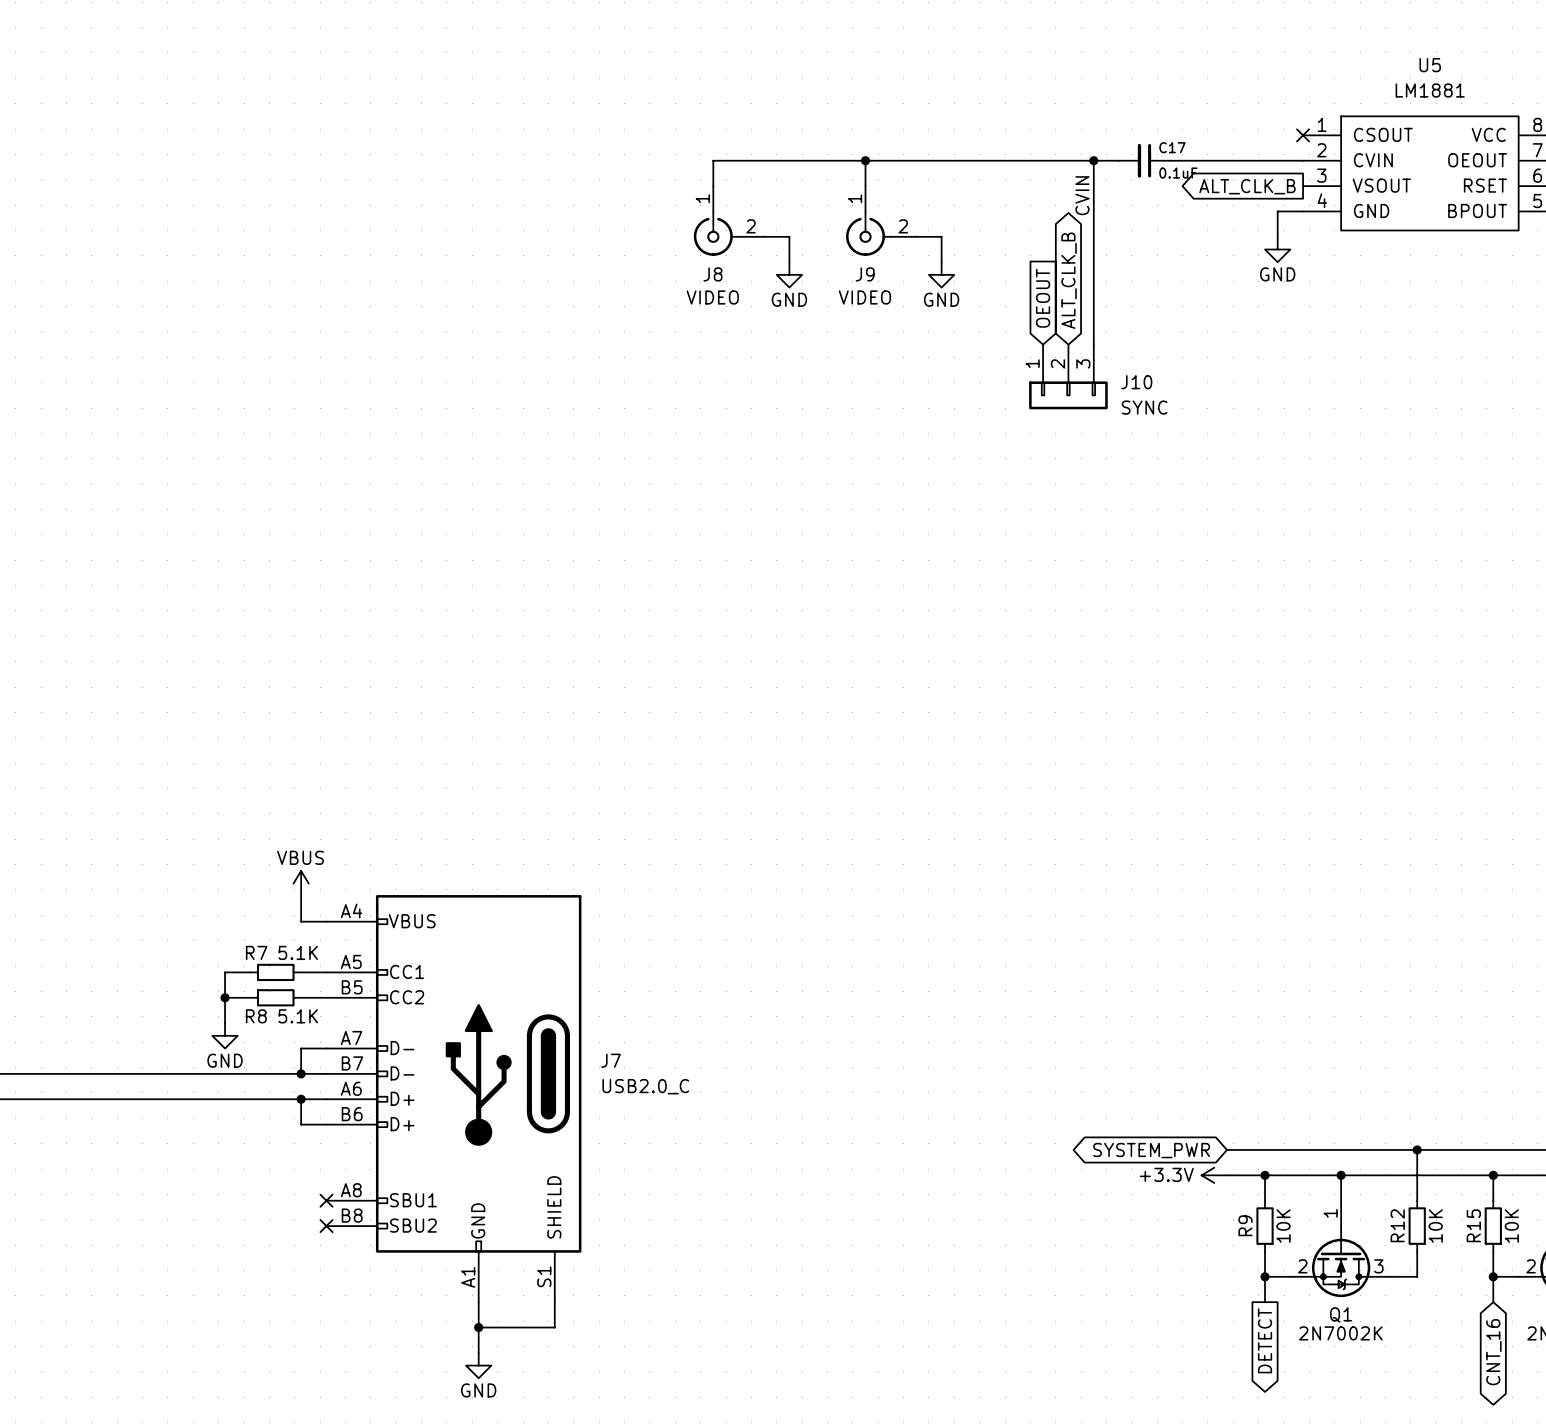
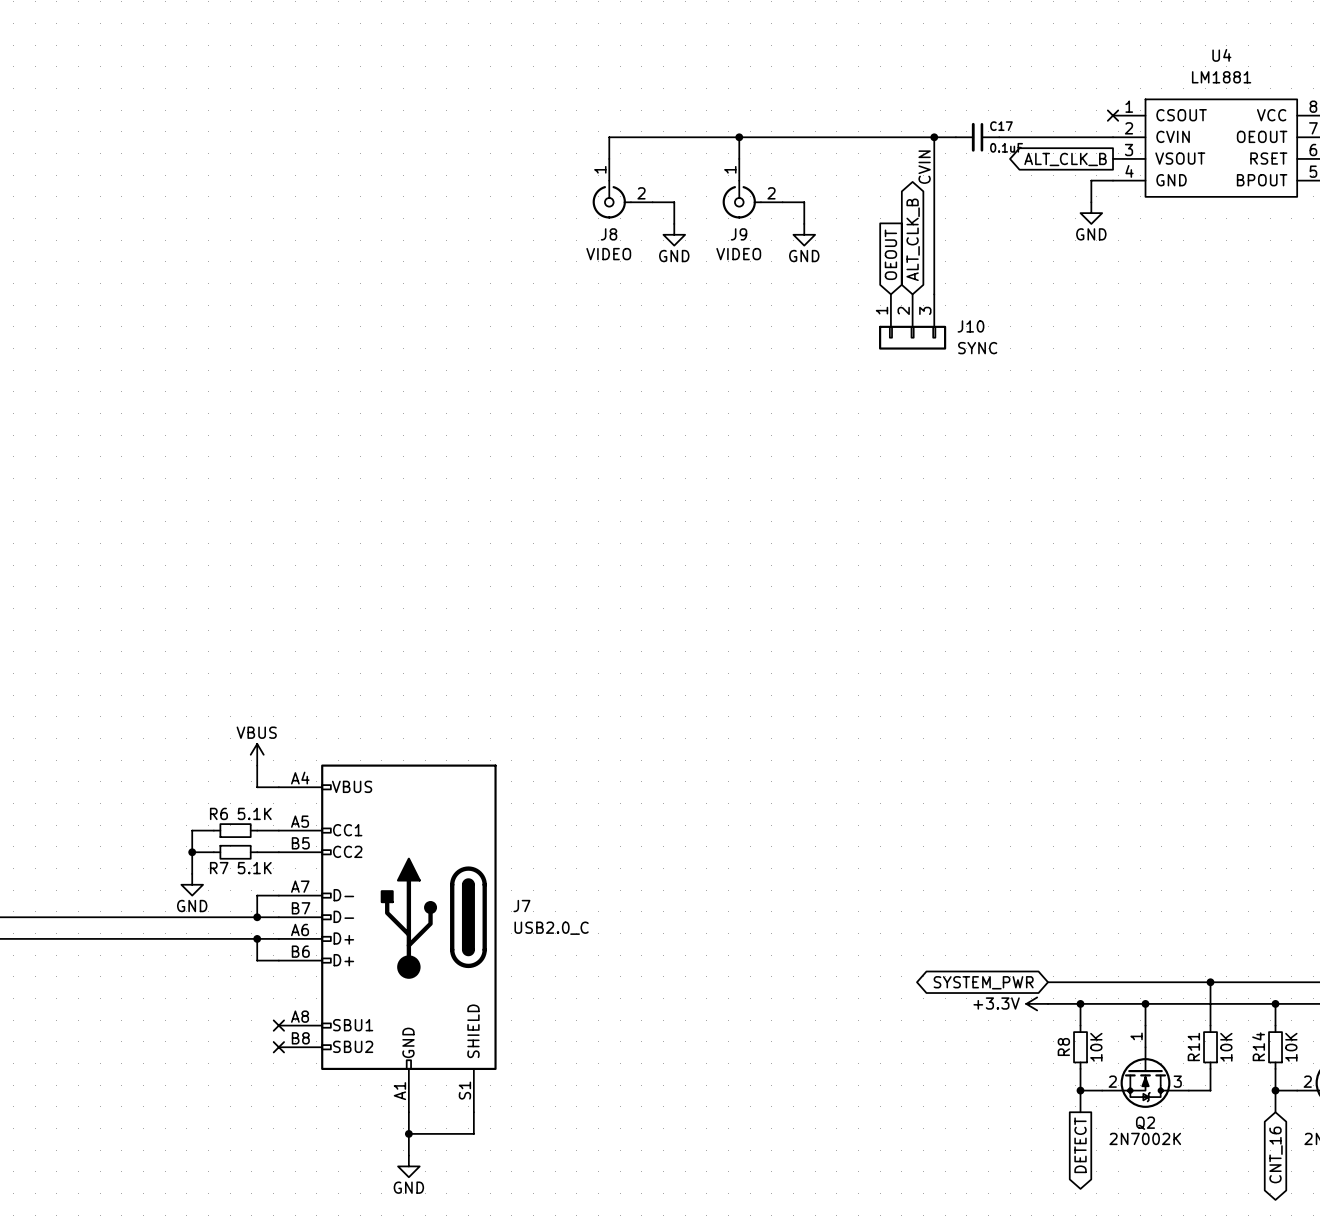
U5 name: U5 (1430, 65) -> U4 (1221, 55)
R7 name: R7 (256, 952) -> R6 (218, 813)
R8 name: R8 (256, 1016) -> R7 (219, 868)
R9 name: R9 (1245, 1225) -> R8 (1063, 1046)
R12 name: R12 (1397, 1225) -> R11 (1193, 1046)
R15 name: R15 (1473, 1225) -> R14 (1258, 1046)
Q1 name: Q1 (1341, 1314) -> Q2 (1145, 1123)

